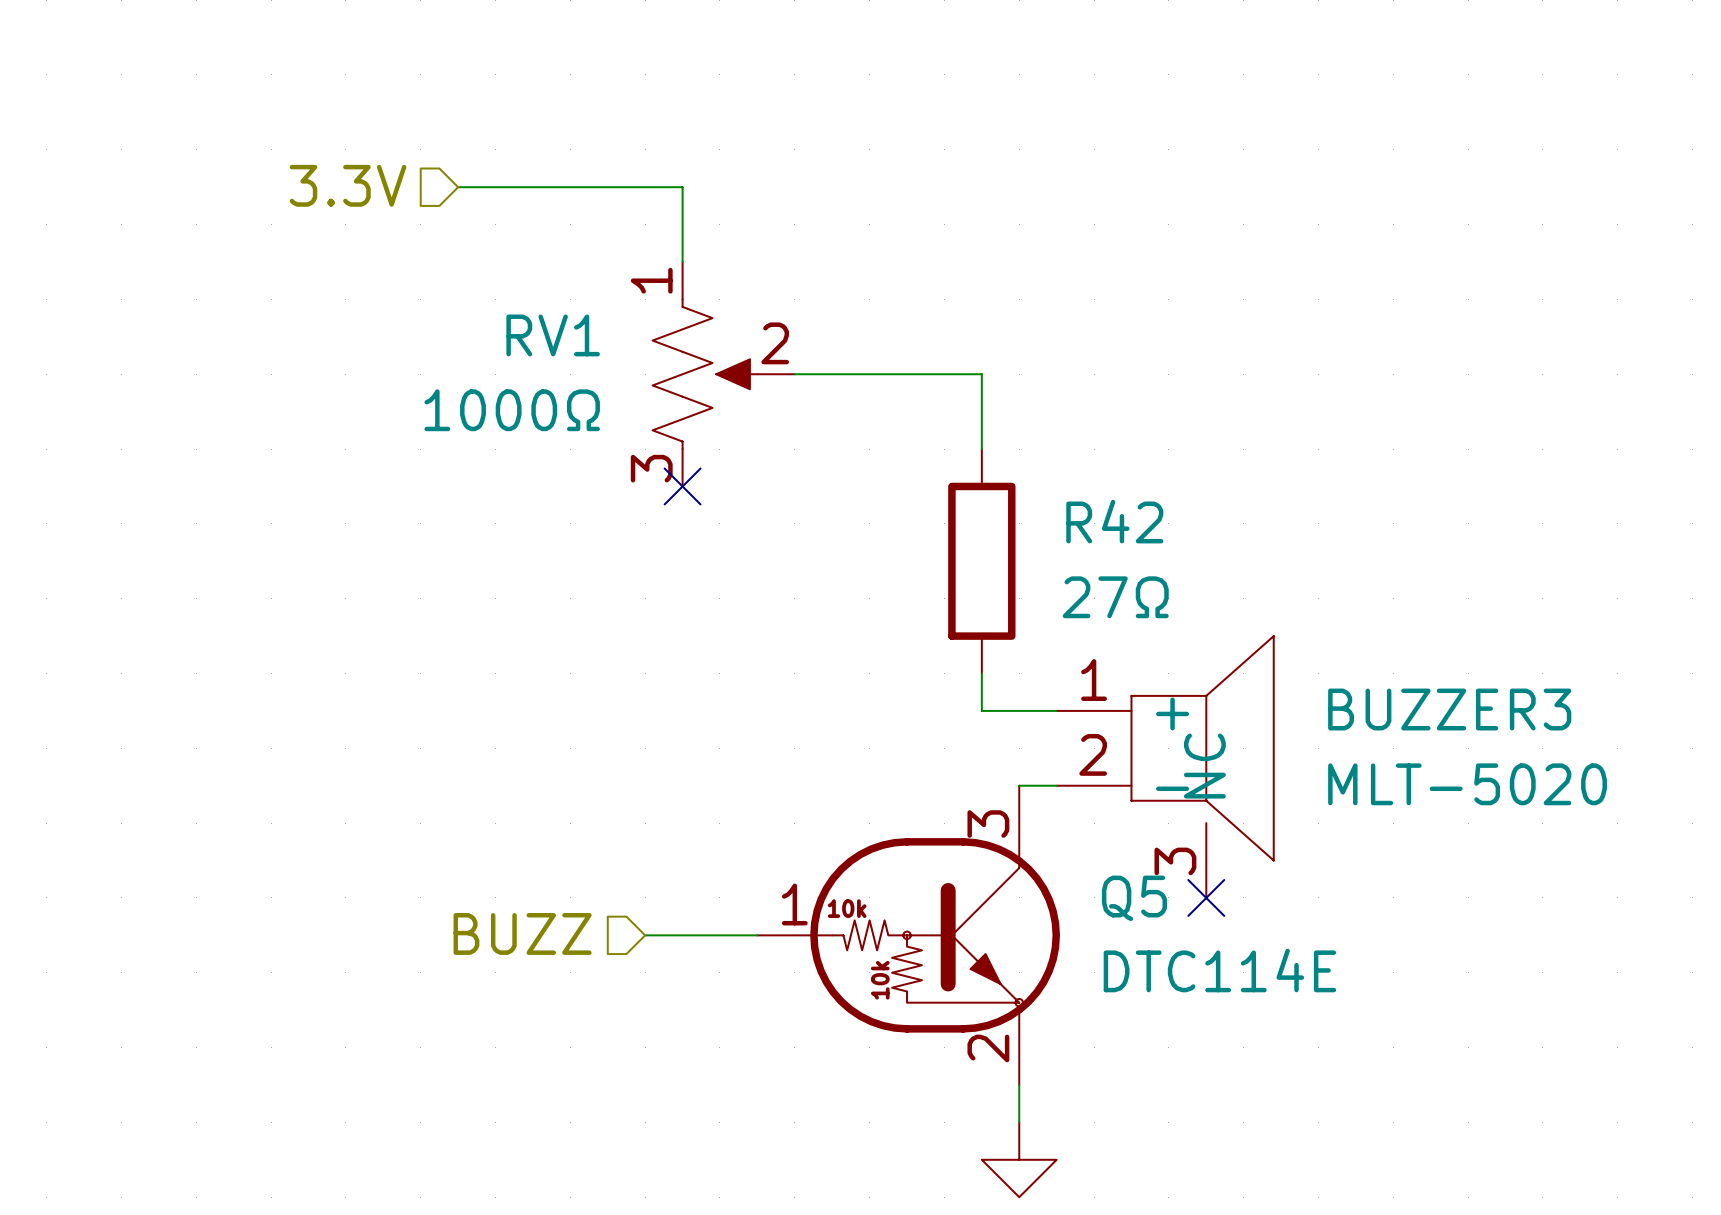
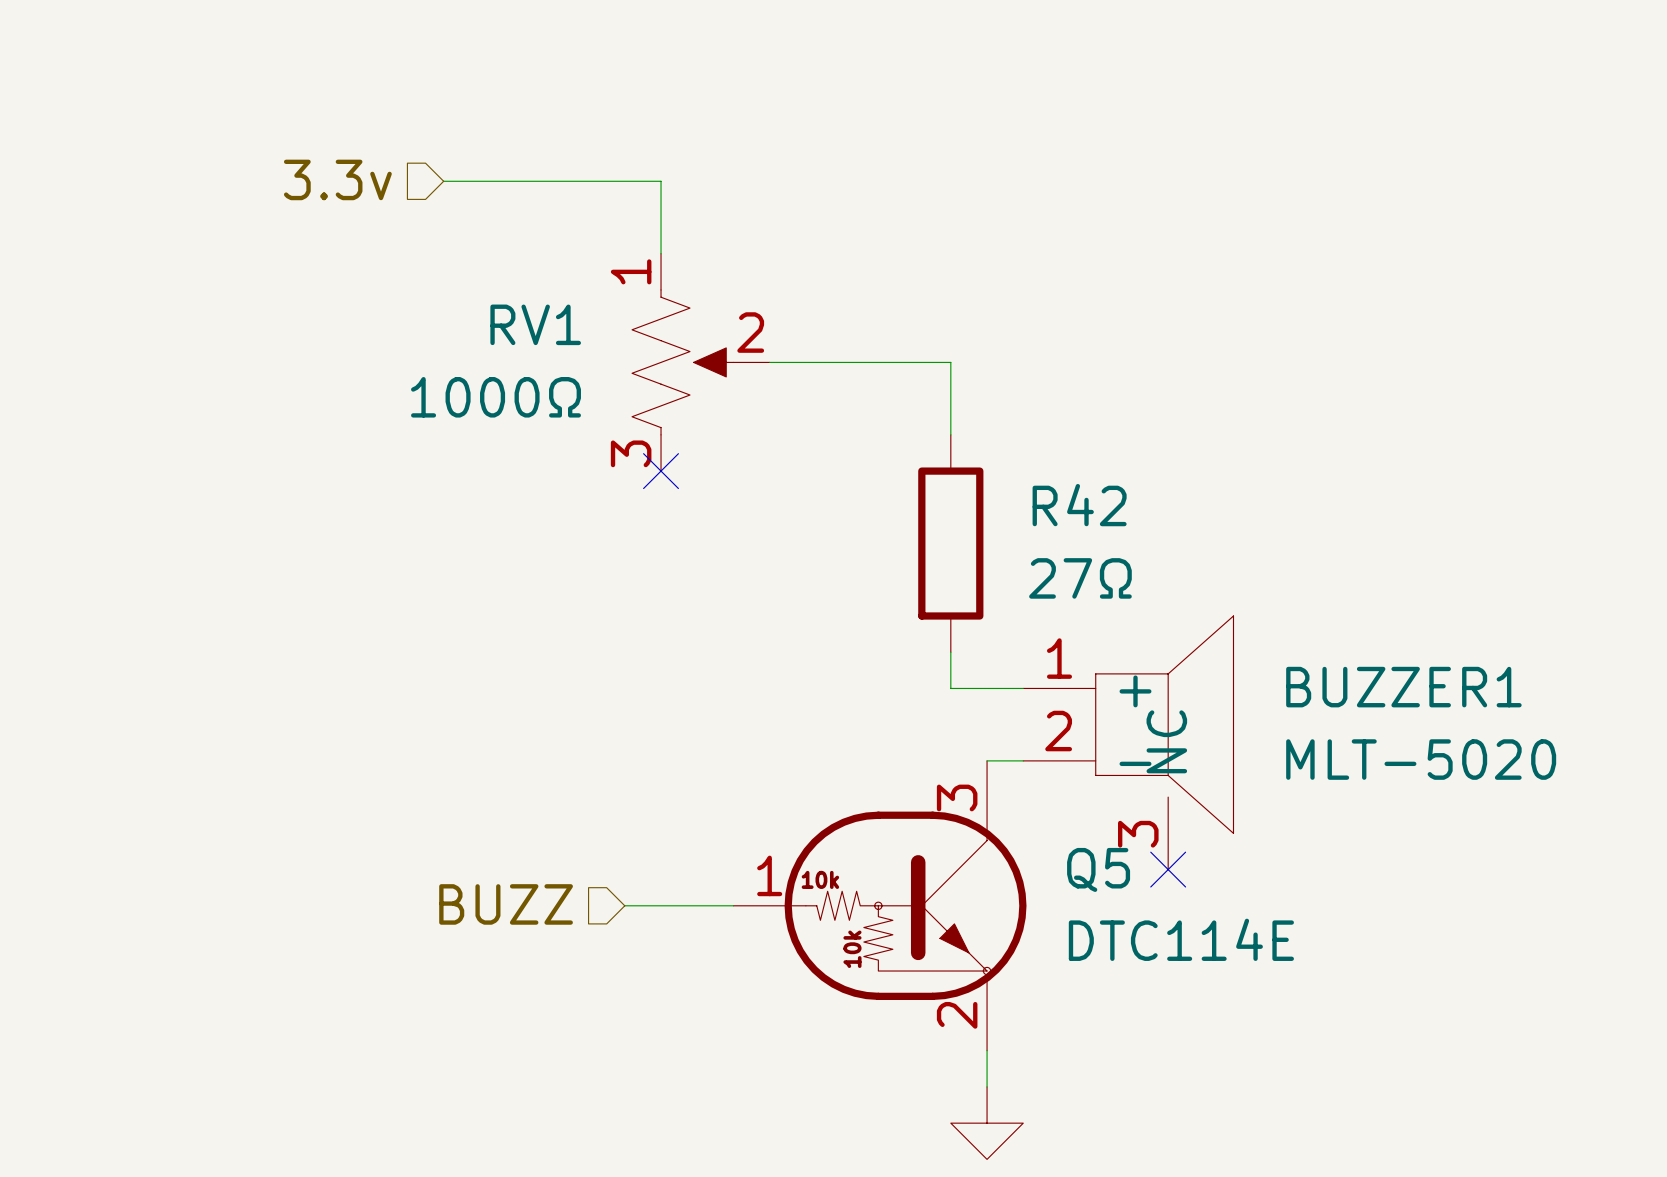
hierarchical label: 3.3V (348, 185) -> 3.3v (337, 179)
BUZZER3 name: BUZZER3 (1449, 709) -> BUZZER1 (1403, 687)

